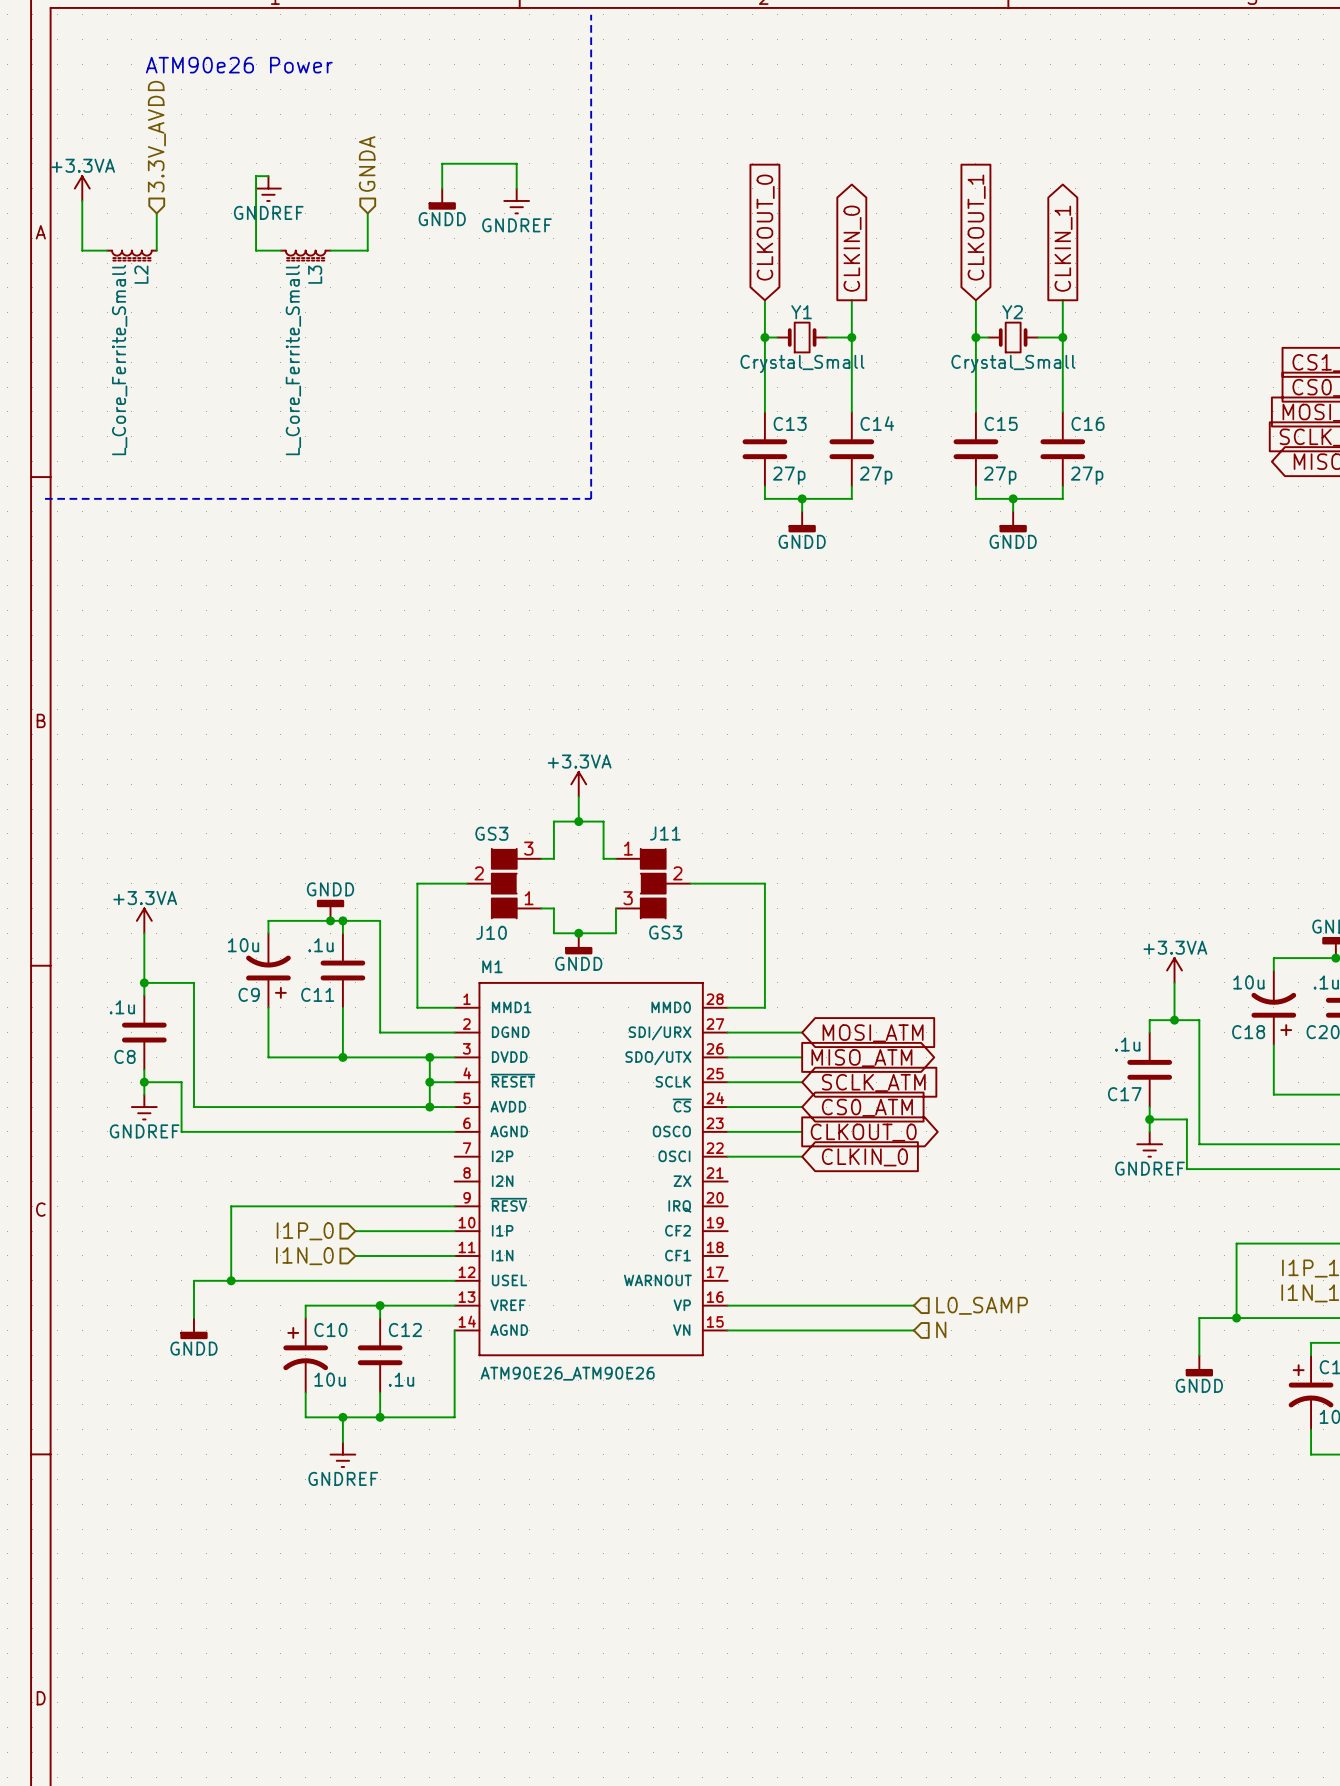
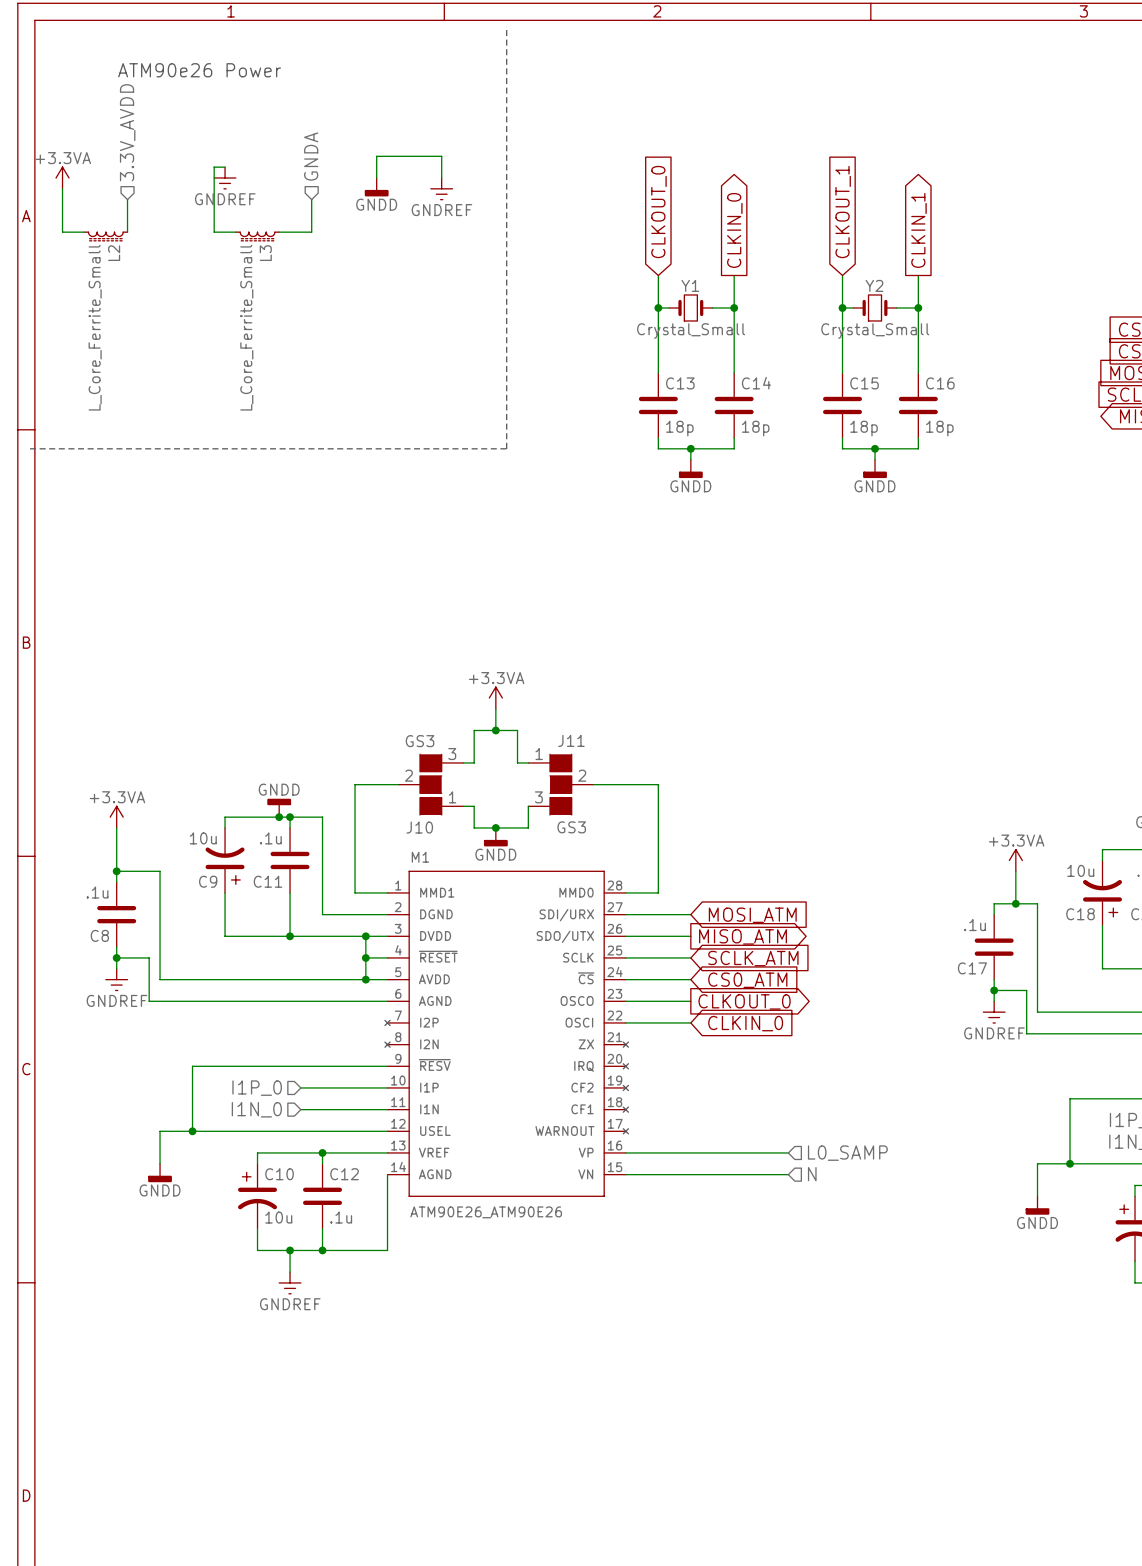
C13 value: 27p (789, 475) -> 18p (679, 428)
C14 value: 27p (876, 475) -> 18p (755, 428)
C15 value: 27p (1000, 475) -> 18p (864, 428)
C16 value: 27p (1087, 475) -> 18p (939, 428)
M1 symbol: [454, 982, 728, 1356] -> [384, 871, 629, 1197]

